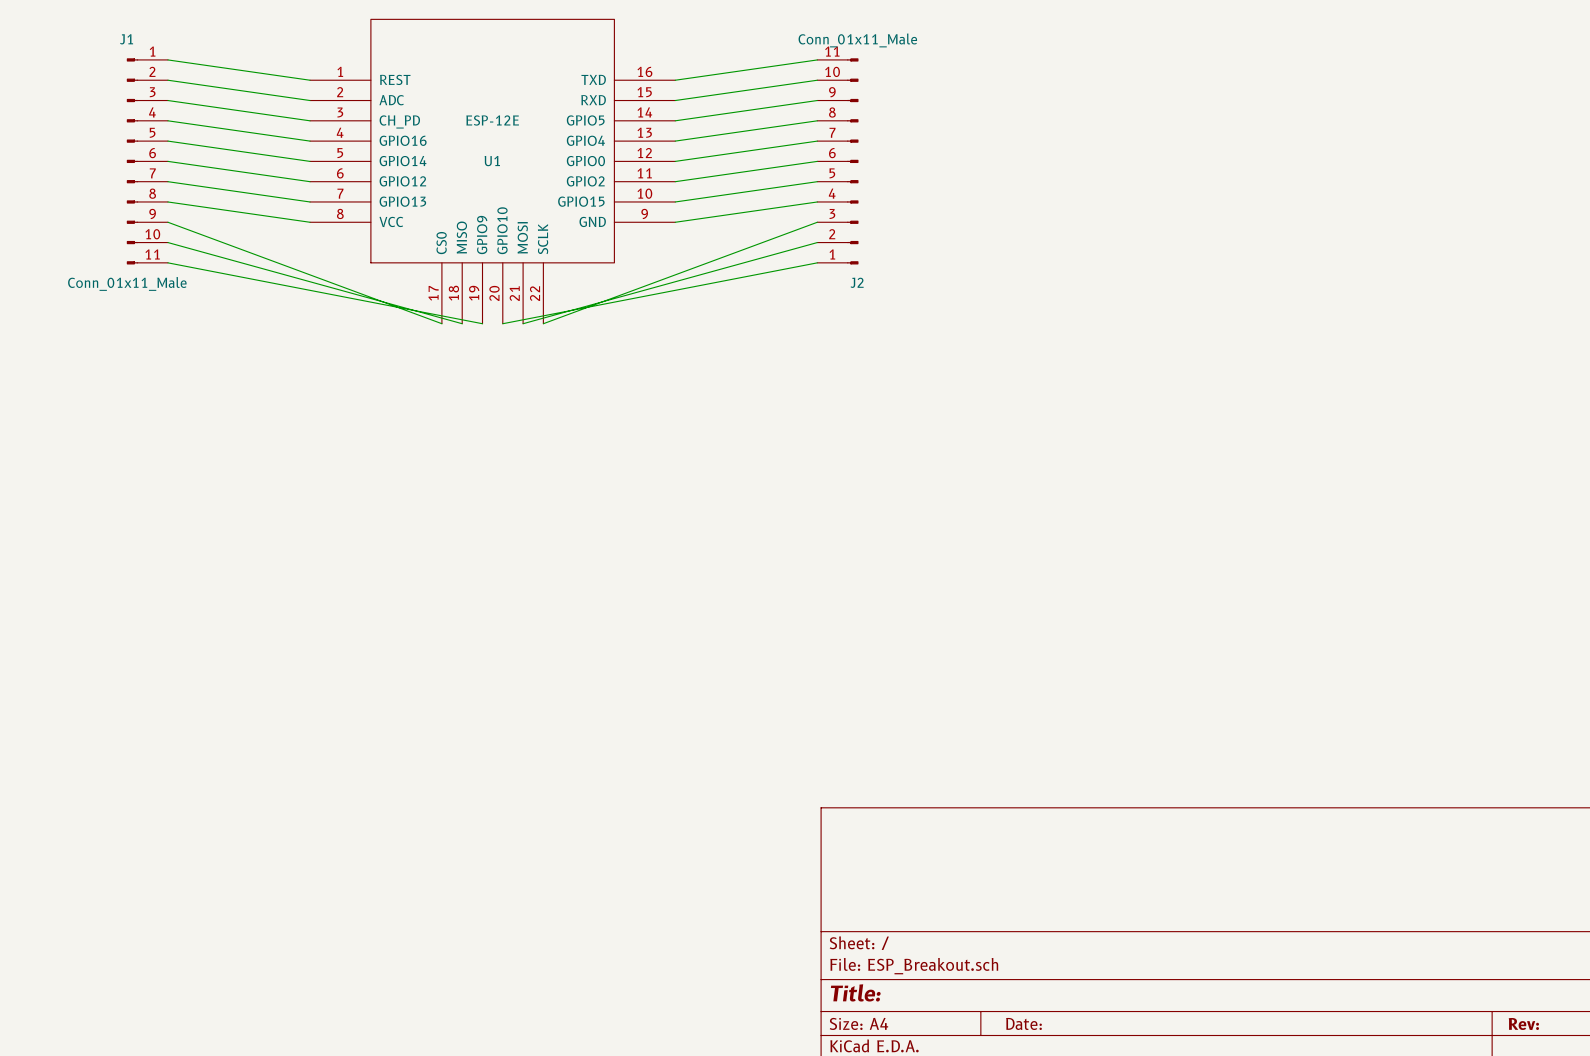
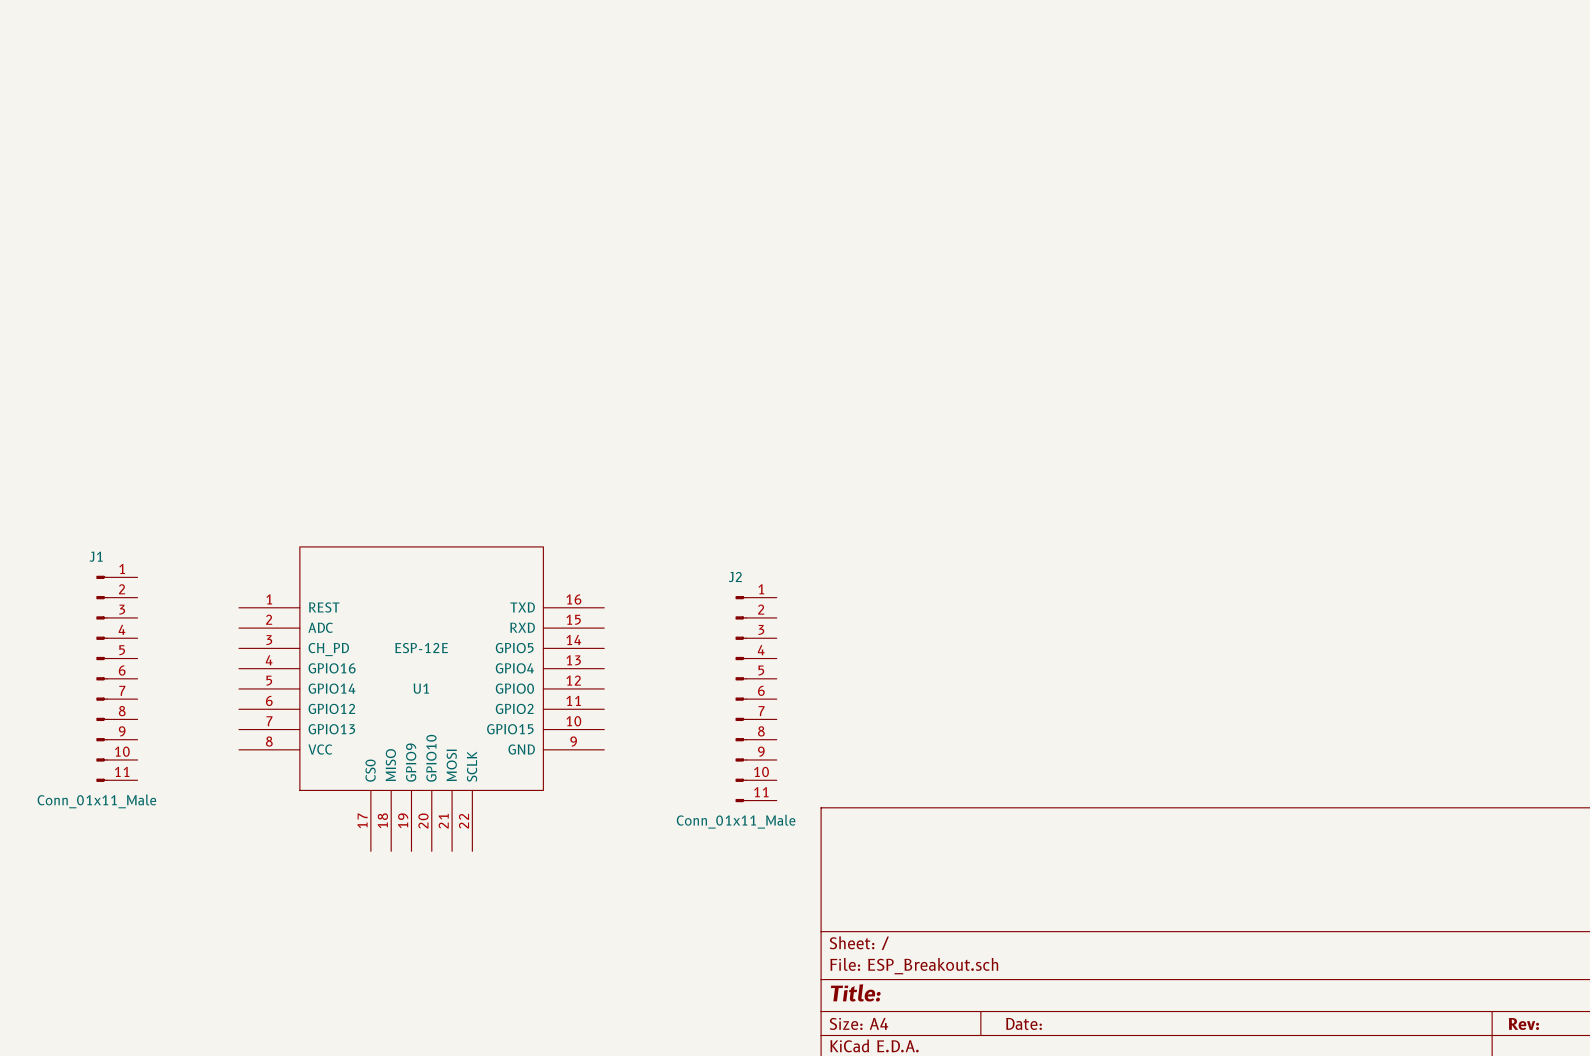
wire: (167, 59) (310, 80) -> none
wire: (817, 59) (675, 80) -> none
wire: (167, 80) (310, 100) -> none
wire: (817, 80) (675, 100) -> none
wire: (167, 100) (310, 120) -> none
wire: (817, 100) (675, 120) -> none
wire: (167, 120) (310, 141) -> none
wire: (817, 120) (675, 141) -> none
wire: (167, 141) (310, 161) -> none
wire: (817, 141) (675, 161) -> none
J1 position: (147, 161) -> (116, 678)
wire: (167, 161) (310, 181) -> none
wire: (817, 161) (675, 181) -> none
J2 position: (837, 161) -> (756, 699)
J2 rotation: 0° (852, 161) -> 180° (741, 699)
U1 position: (492, 171) -> (421, 699)
wire: (167, 181) (310, 201) -> none
wire: (817, 181) (675, 201) -> none
wire: (167, 201) (310, 222) -> none
wire: (817, 201) (675, 222) -> none
wire: (167, 222) (441, 323) -> none
wire: (817, 222) (543, 323) -> none
wire: (167, 242) (462, 323) -> none
wire: (817, 242) (523, 323) -> none
wire: (167, 262) (482, 323) -> none
wire: (817, 262) (502, 323) -> none

